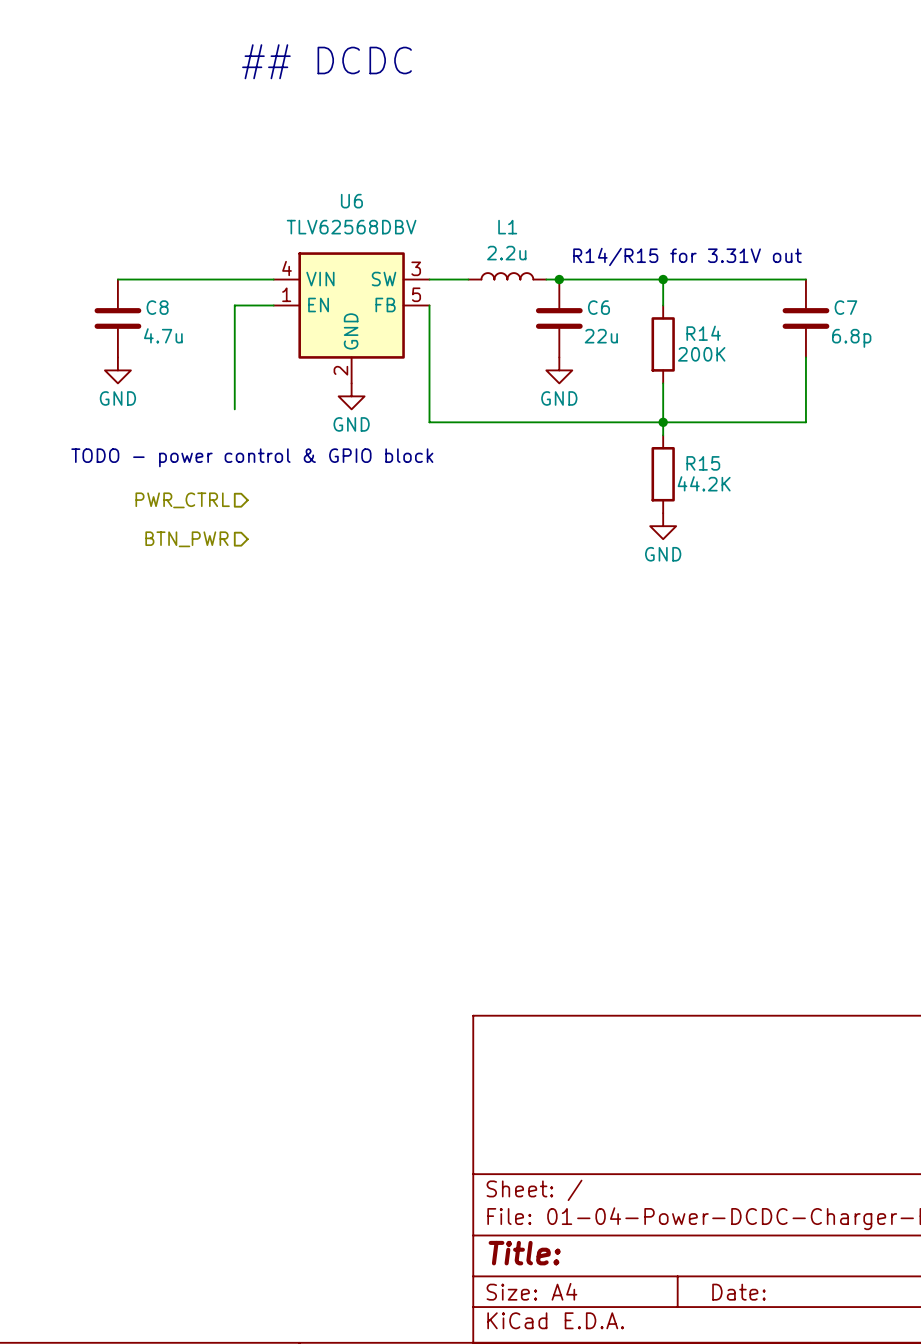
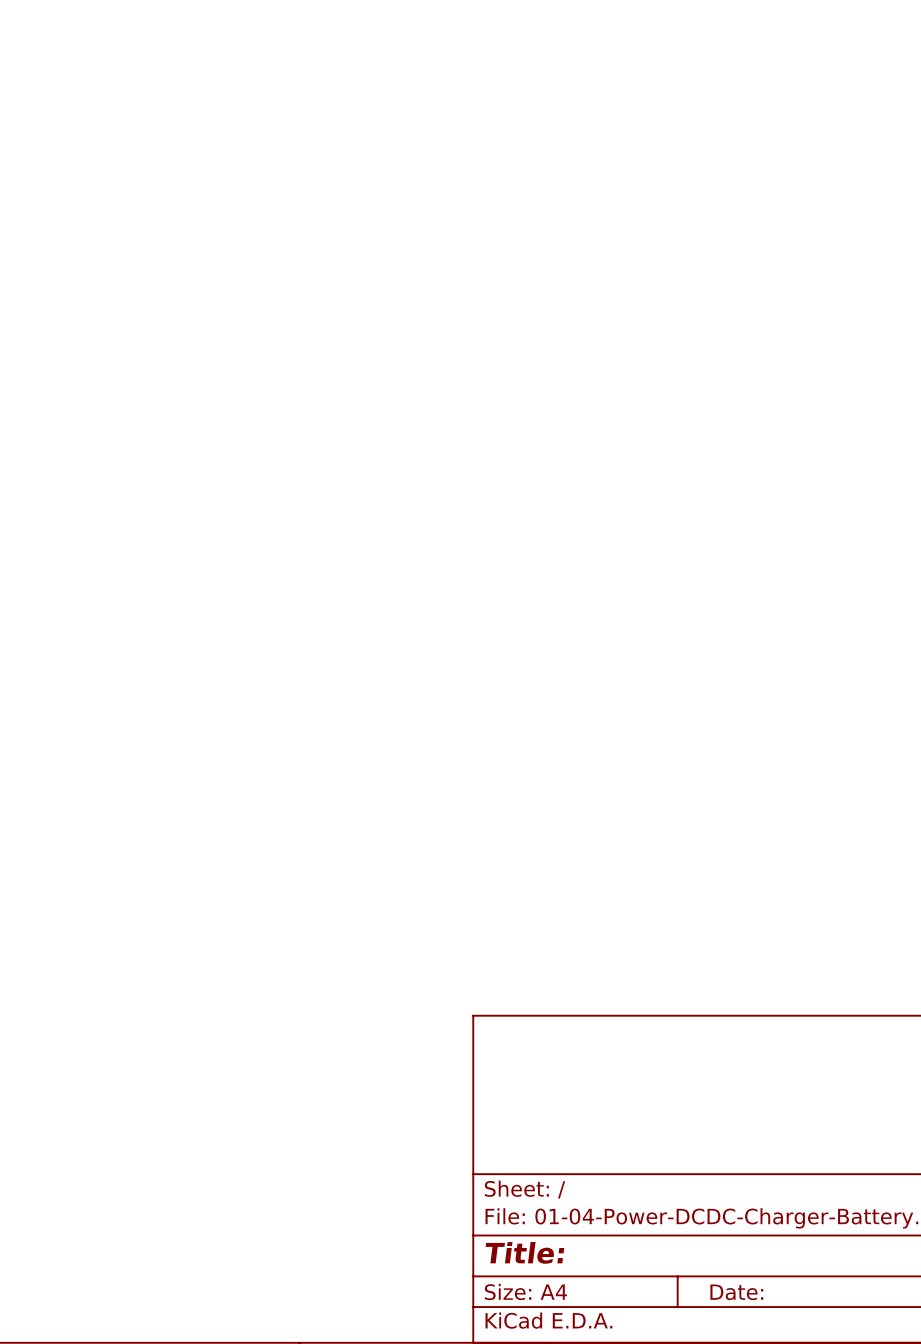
text: ## DCDC (327, 61) -> none
text: R14/R15 for 3.31V out (687, 256) -> none
L1: 2.2u (507, 276) -> none
wire: (117, 279) (273, 279) -> none
wire: (429, 279) (468, 279) -> none
wire: (546, 279) (805, 279) -> none
junction: (559, 279) -> none
wire: (663, 279) (663, 305) -> none
junction: (663, 279) -> none
wire: (273, 305) (234, 305) (234, 409) -> none
wire: (429, 305) (429, 422) (805, 422) (805, 357) -> none
U6: TLV62568DBV (351, 317) -> none
C8: 4.7u (117, 318) -> none
C6: 22u (559, 318) -> none
C7: 6.8p (805, 318) -> none
R14: 200K (663, 344) -> none
power symbol: GND (117, 370) -> none
power symbol: GND (559, 370) -> none
wire: (663, 383) (663, 435) -> none
power symbol: GND (351, 396) -> none
junction: (663, 422) -> none
text: TODO - power control & GPIO block (252, 457) -> none
R15: 44.2K (663, 474) -> none
hierarchical label: PWR_CTRL (182, 500) -> none
power symbol: GND (663, 526) -> none
hierarchical label: BTN_PWR (186, 539) -> none

